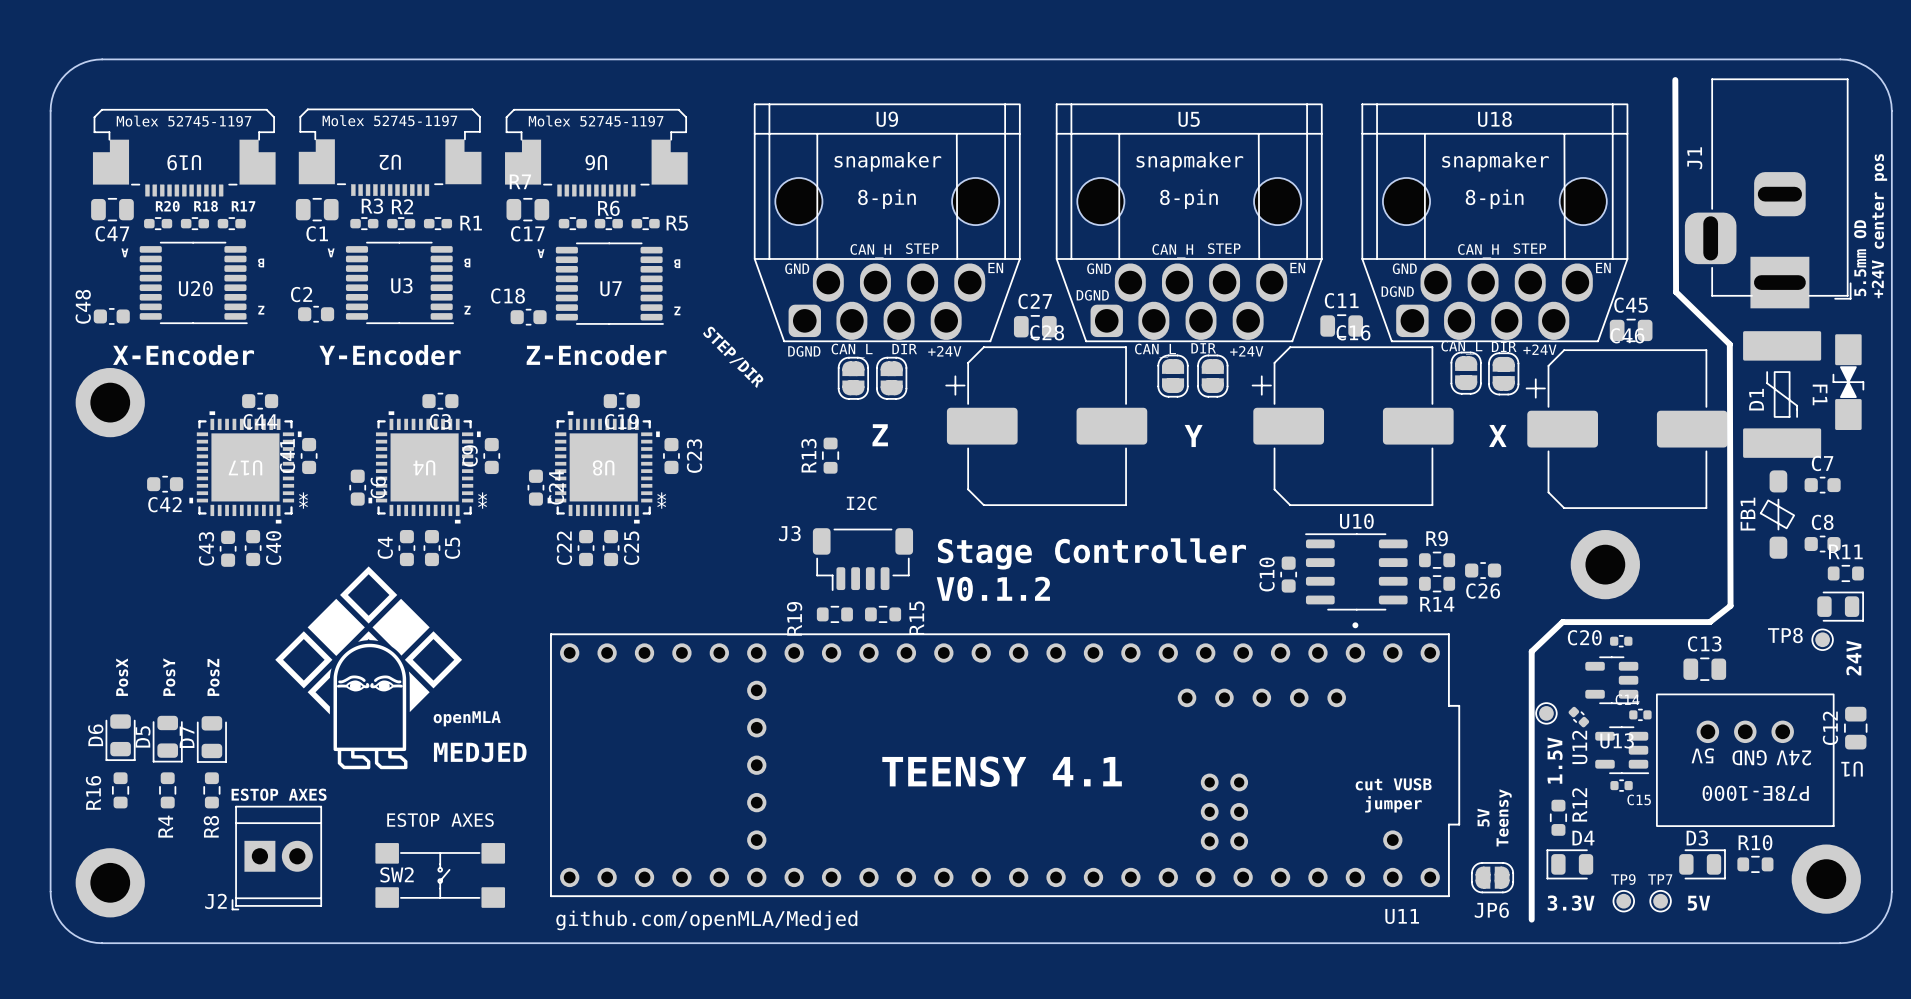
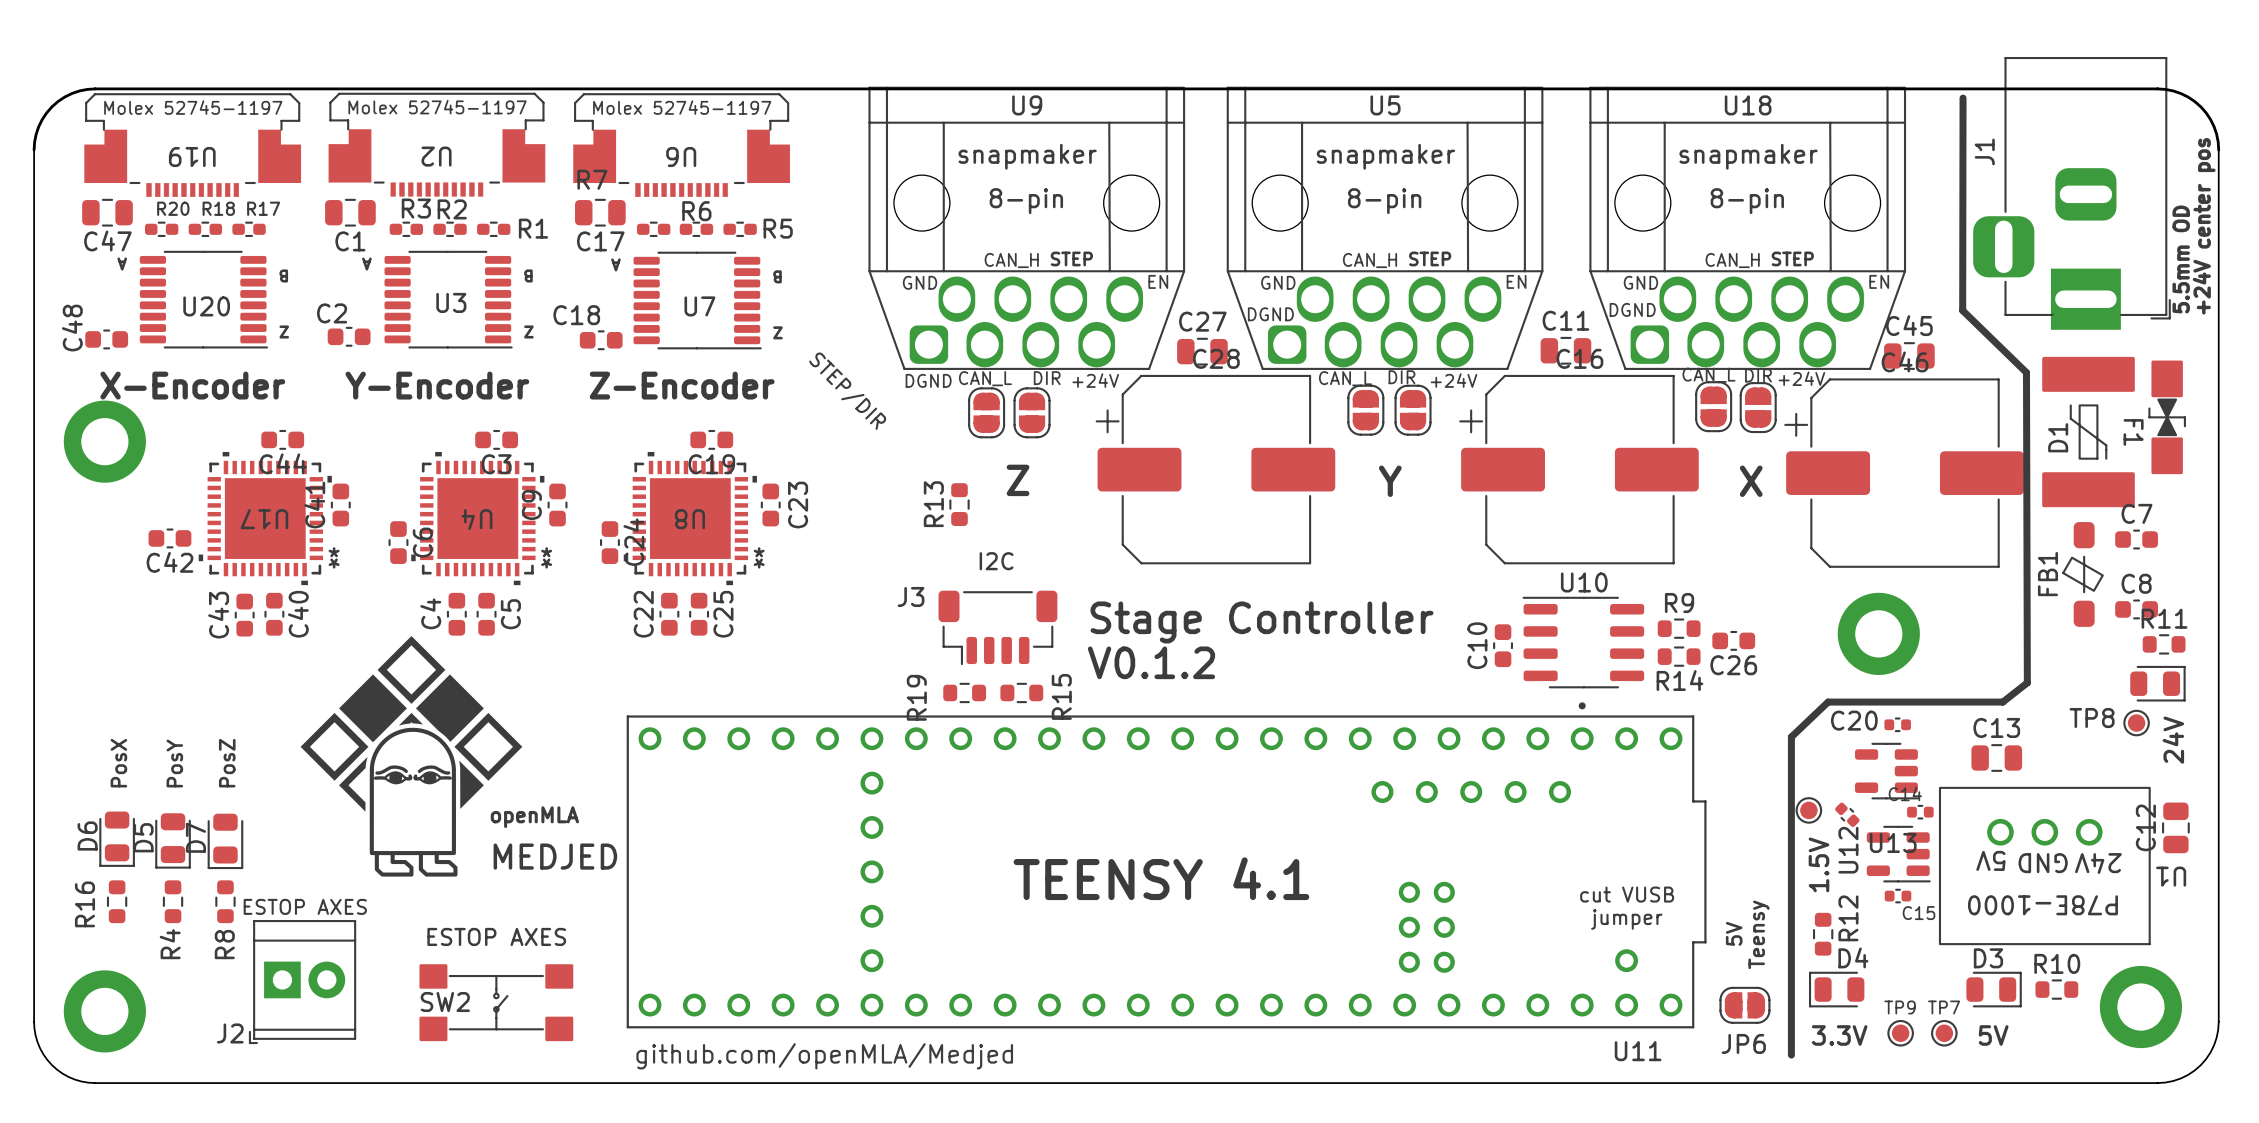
line: (1675, 80) (1676, 292) -> (1963, 98) (1962, 310)
board edge: (50, 156) (50, 105) (55, 88) (61, 78) (74, 67) (90, 60) (102, 59) (1840, 59) (1853, 61) (1866, 66) (1876, 74) (1884, 85) (1891, 104) (1891, 156) -> (34, 150) (38, 126) (52, 106) (71, 93) (95, 88) (2157, 88) (2180, 93) (2200, 106) (2214, 126) (2218, 150)

